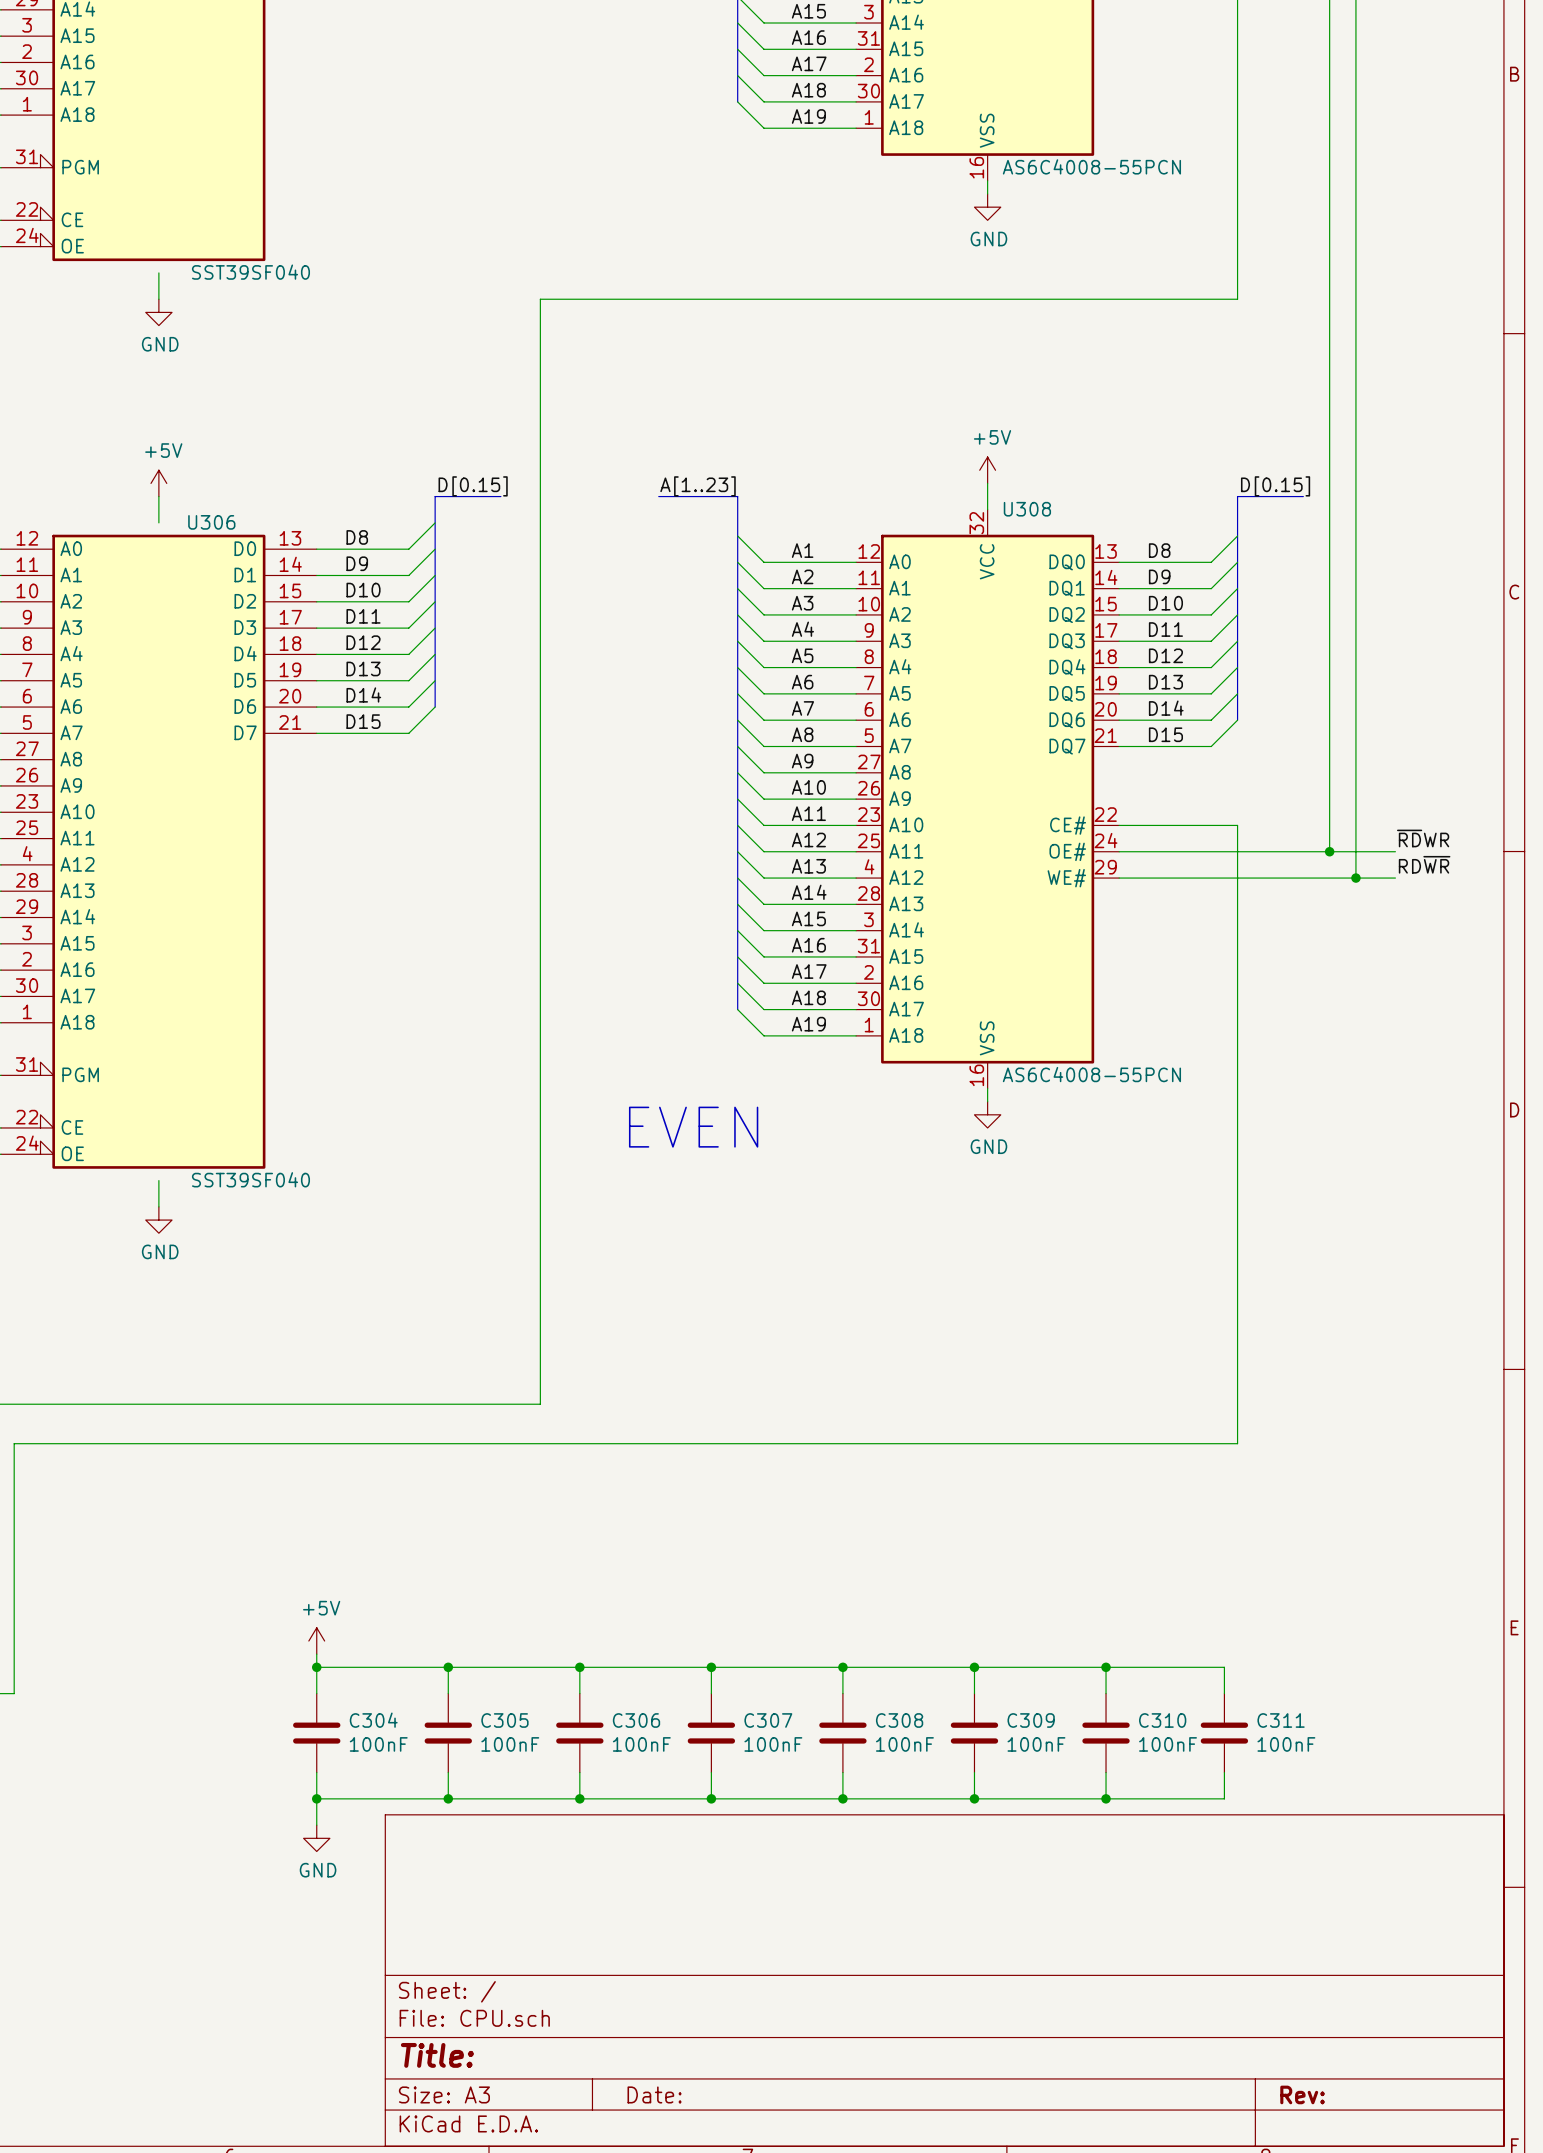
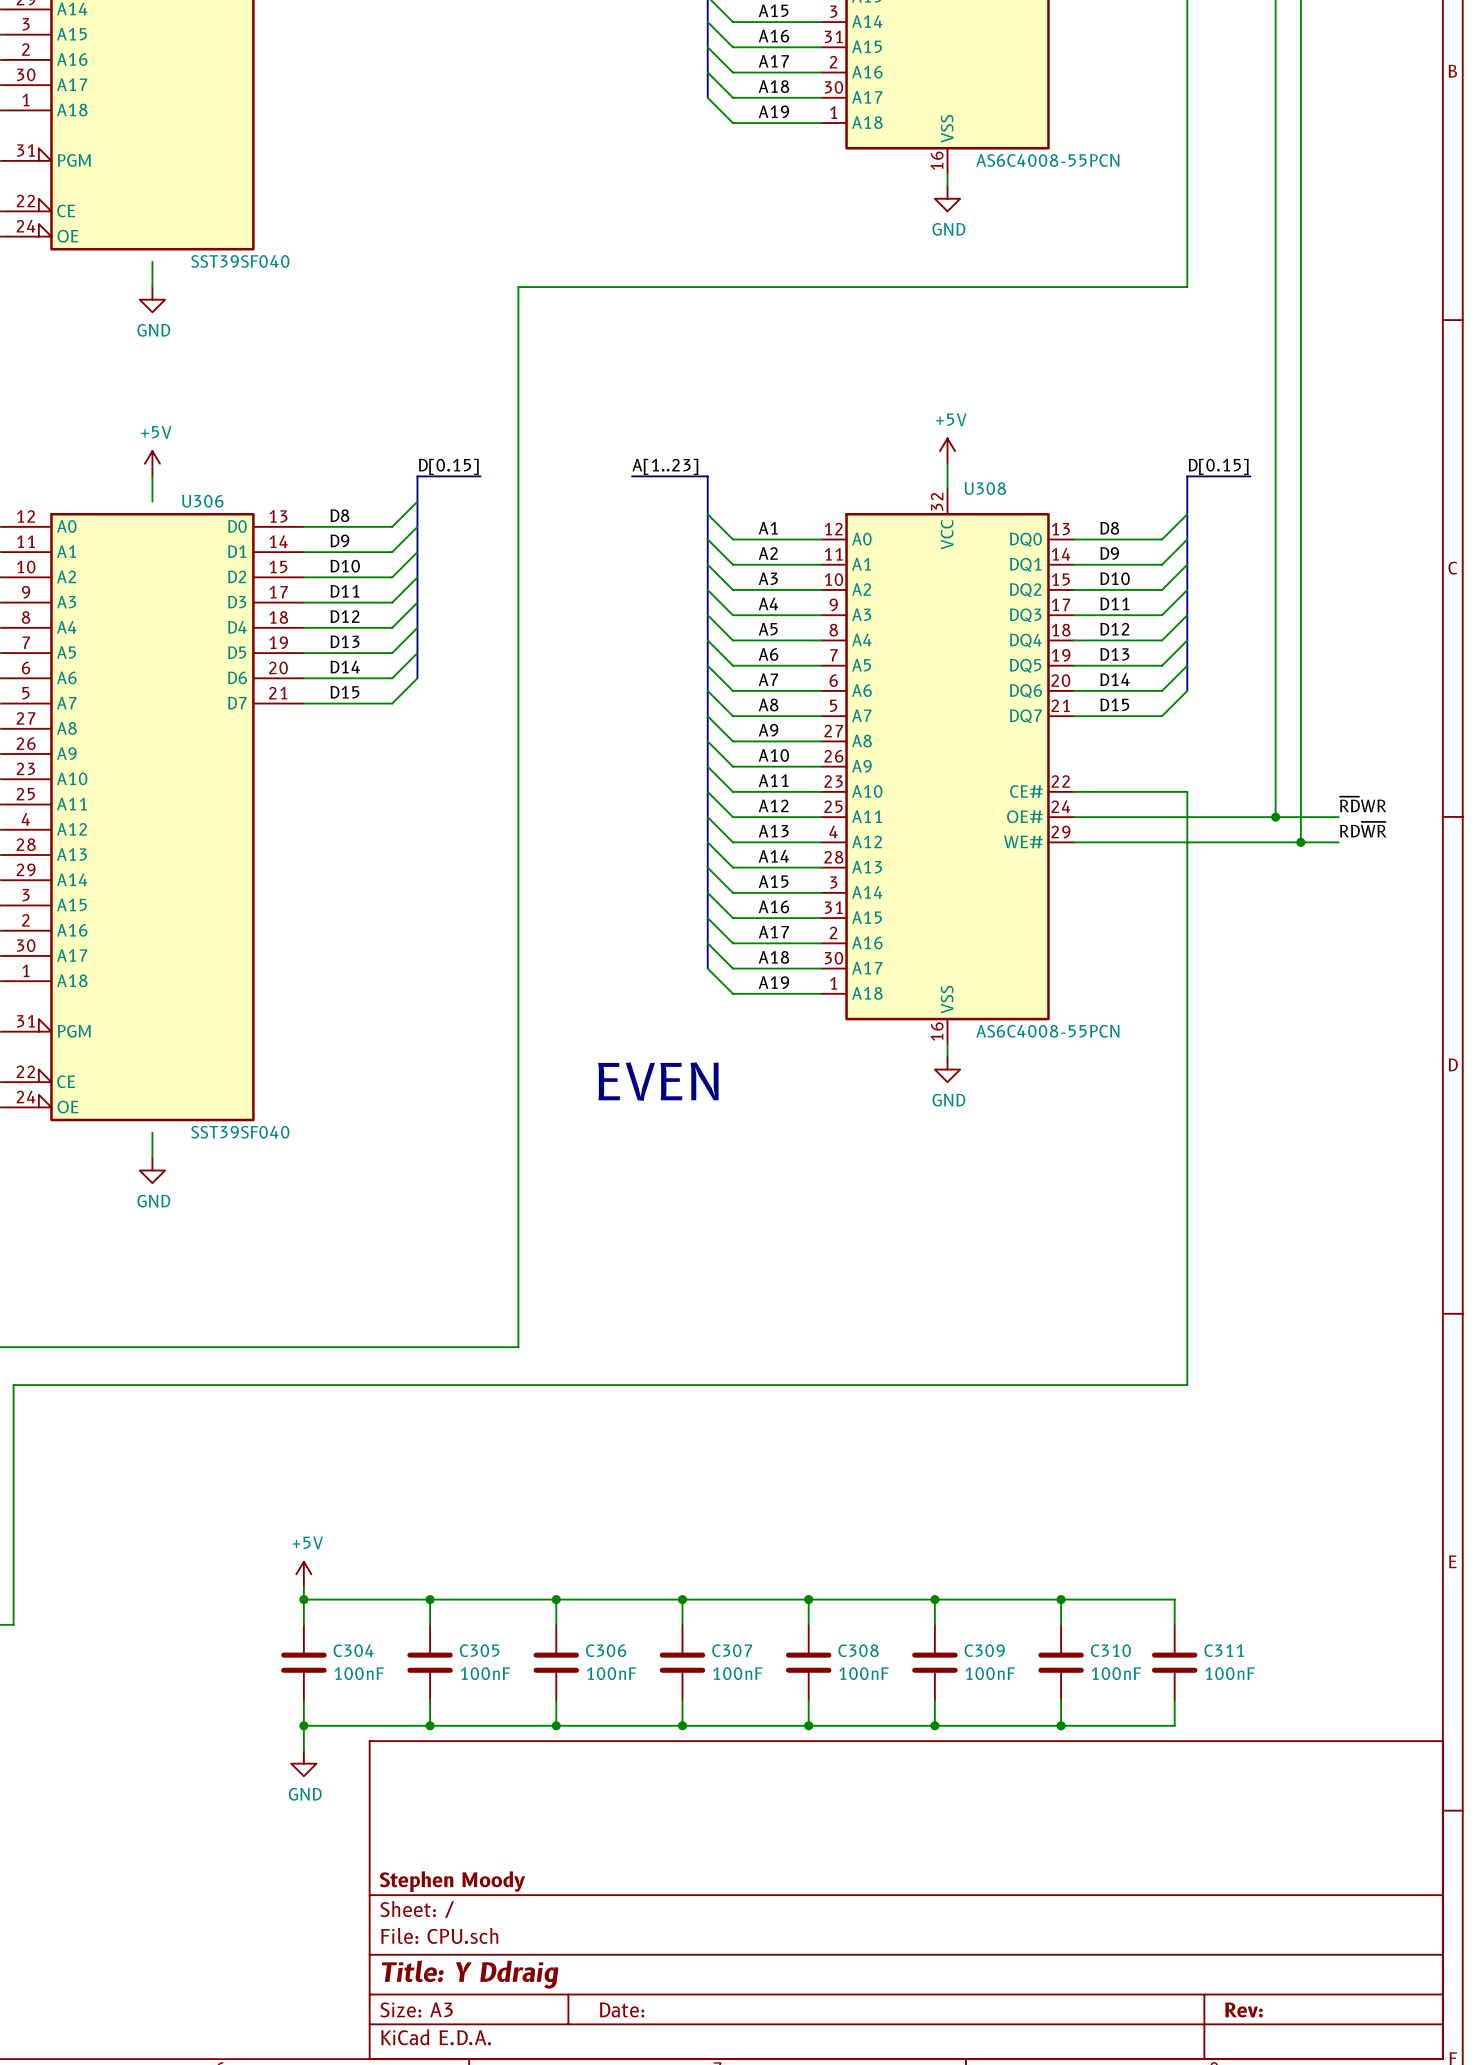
title block: none -> Stephen Moody (452, 1881)
title block: Title: (437, 2055) -> Title: Y Ddraig (470, 1974)

